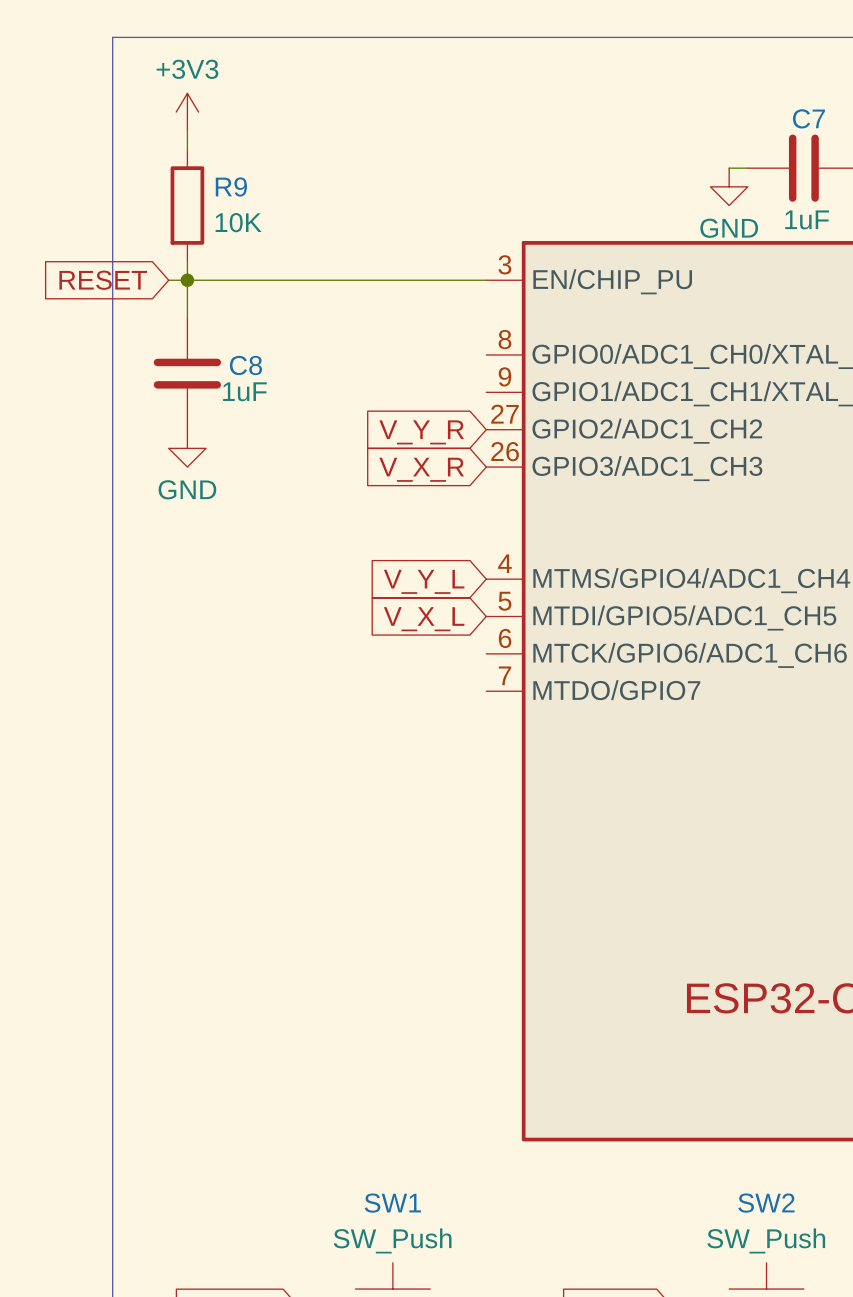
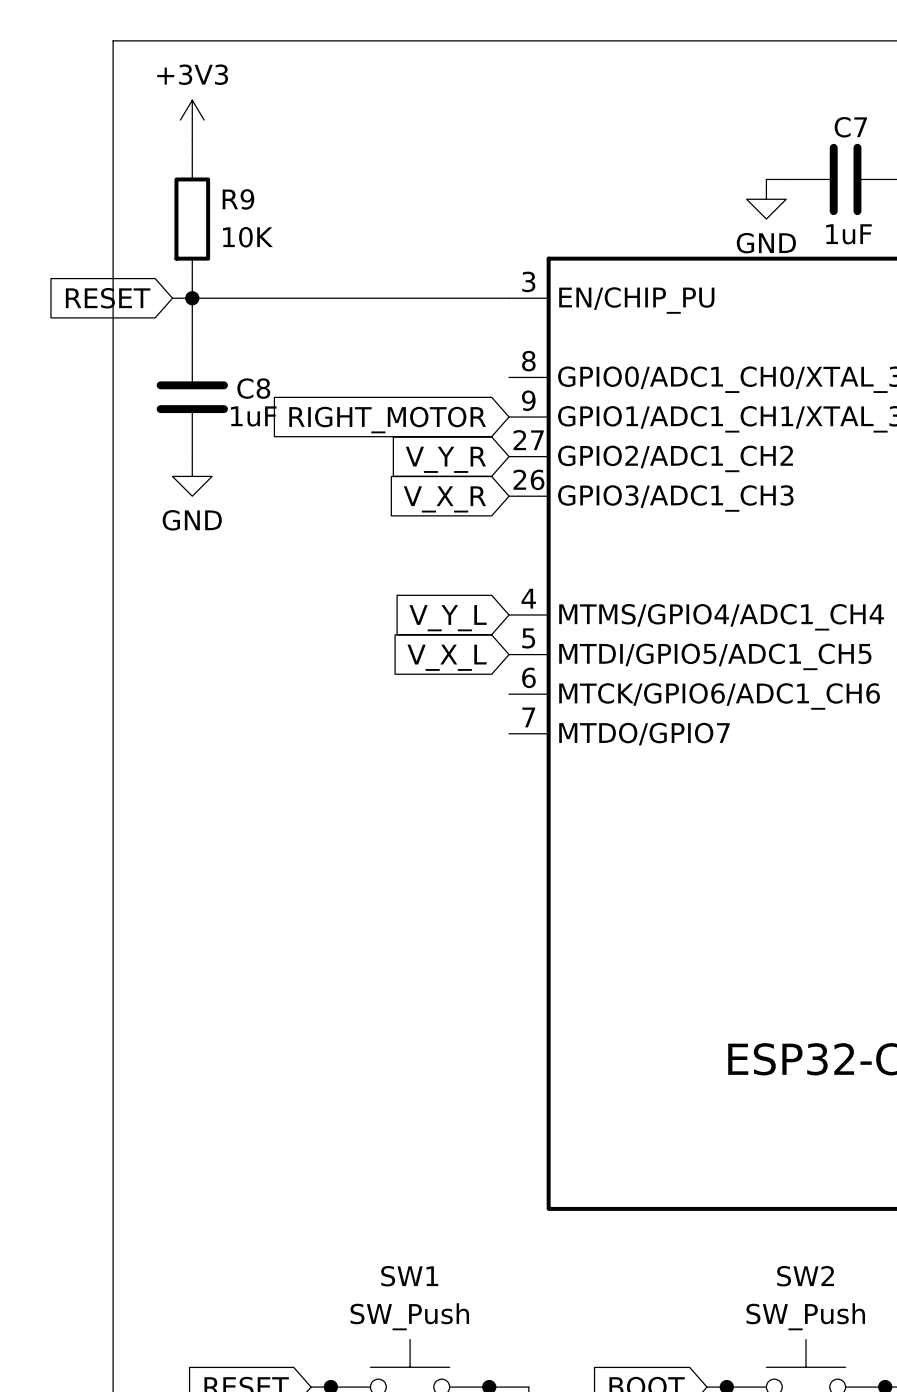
global label: none -> RIGHT_MOTOR (387, 420)

